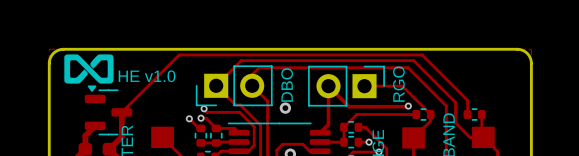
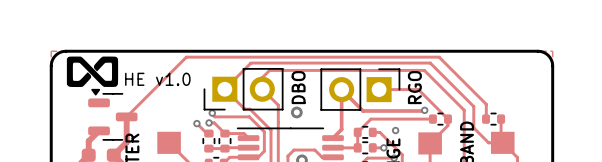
via: none -> (395, 130)

